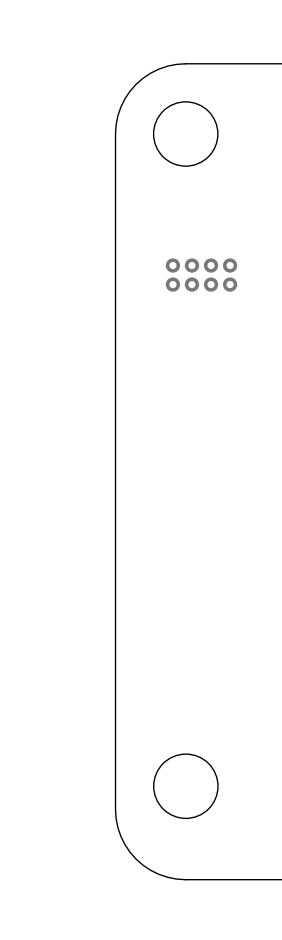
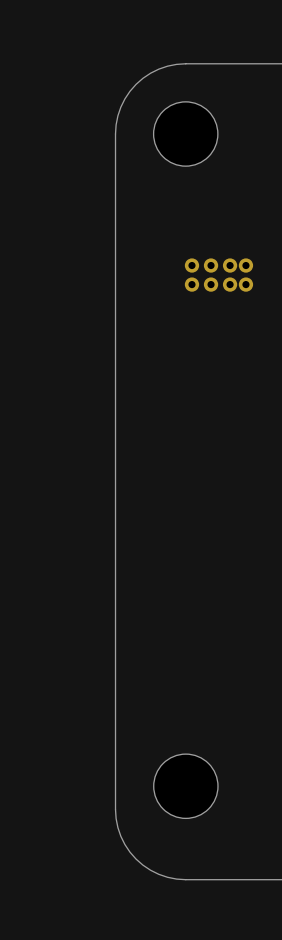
via: (172, 265) -> none
via: none -> (245, 265)
via: (172, 284) -> none
via: none -> (245, 284)

